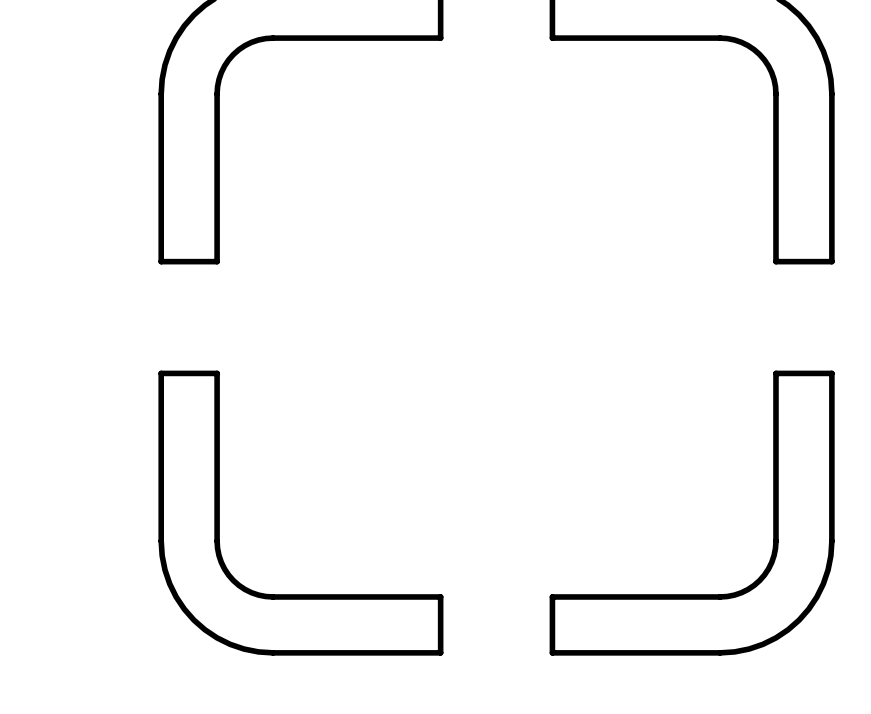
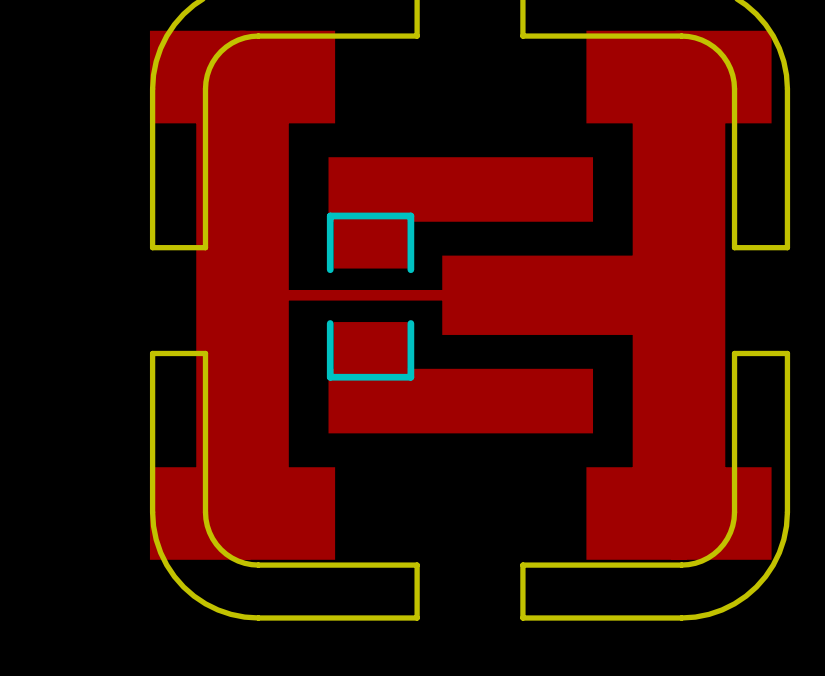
part: none -> (460, 295)

